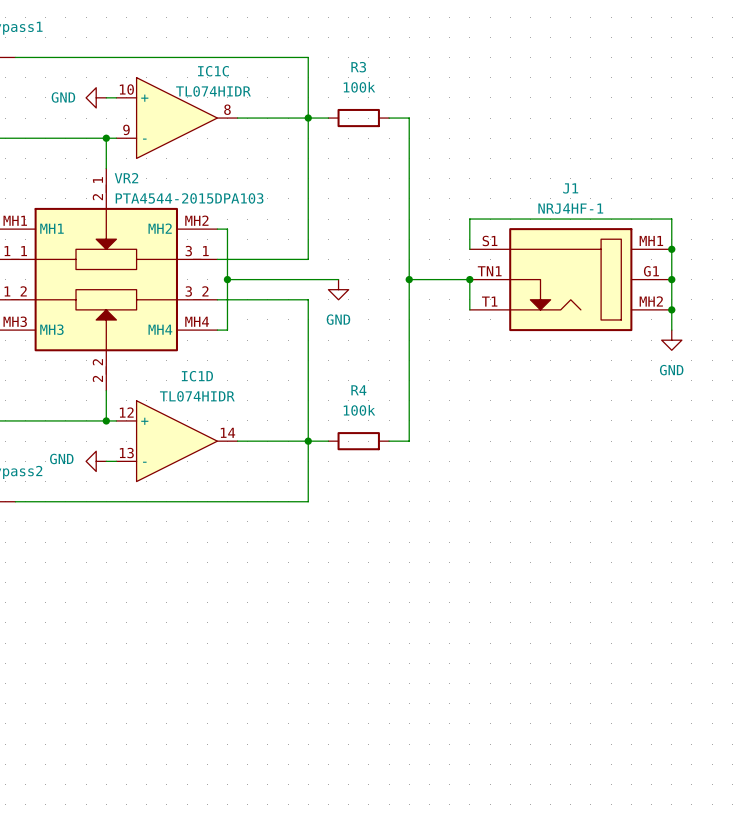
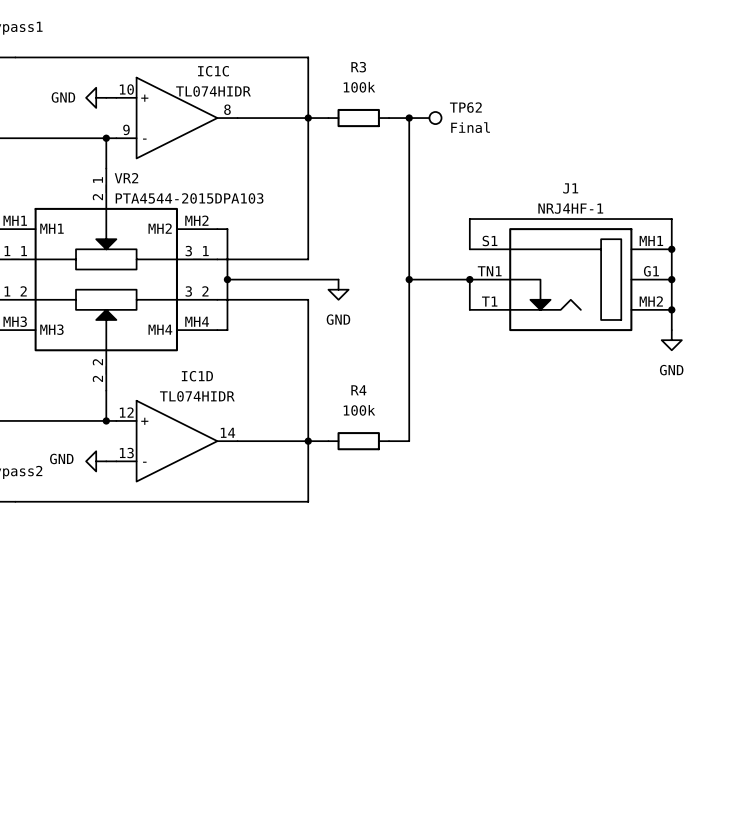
junction: none -> (409, 118)
TP62: none -> Final (425, 118)

